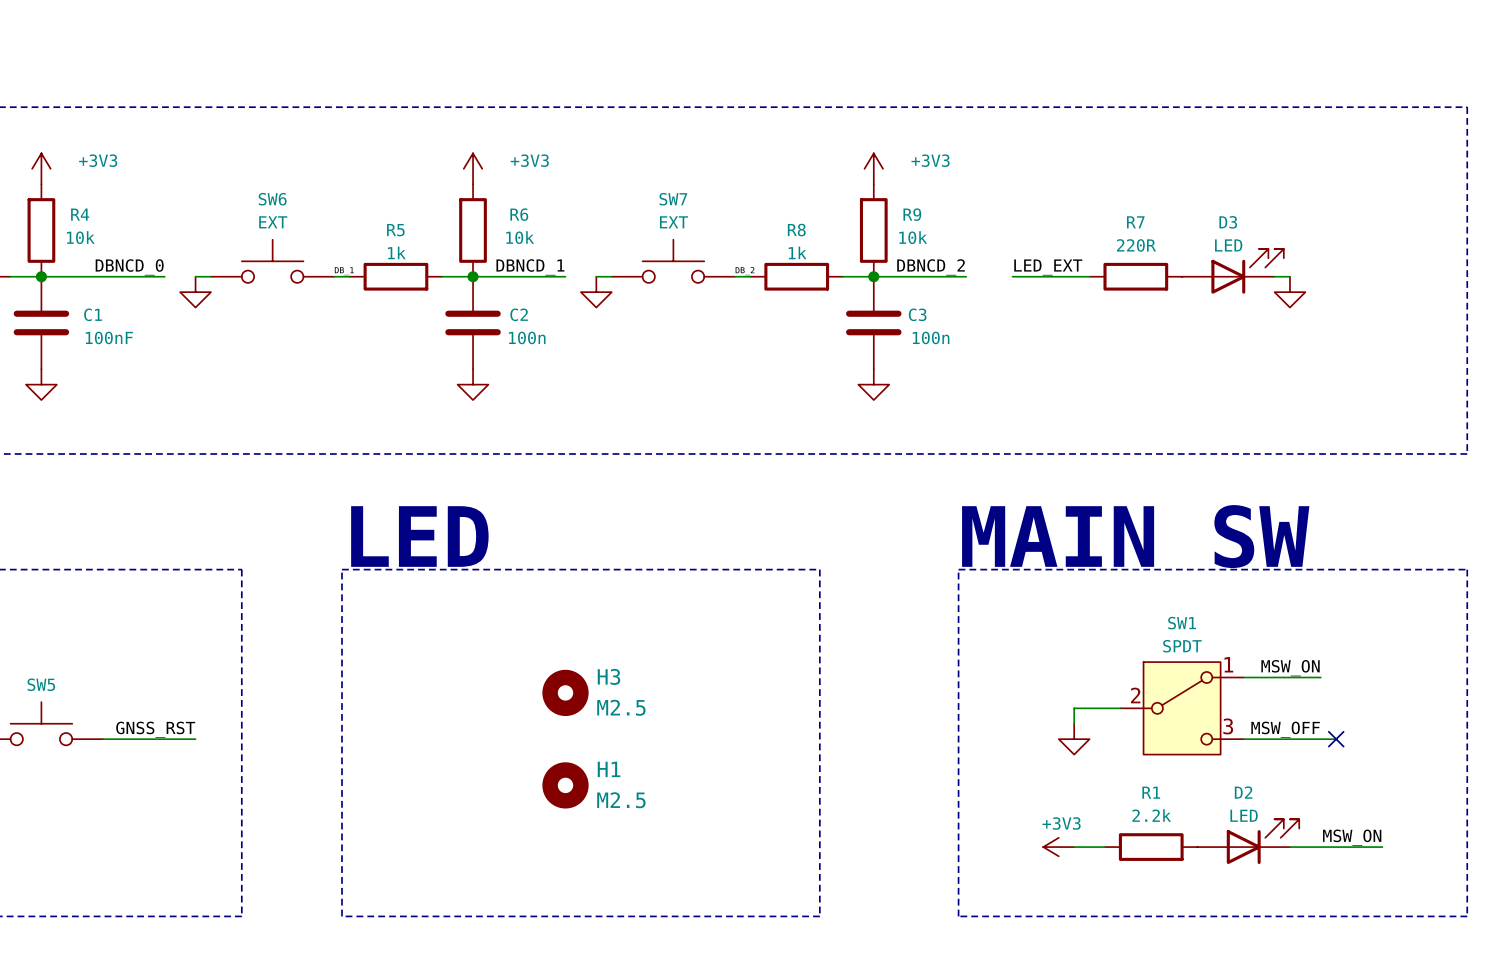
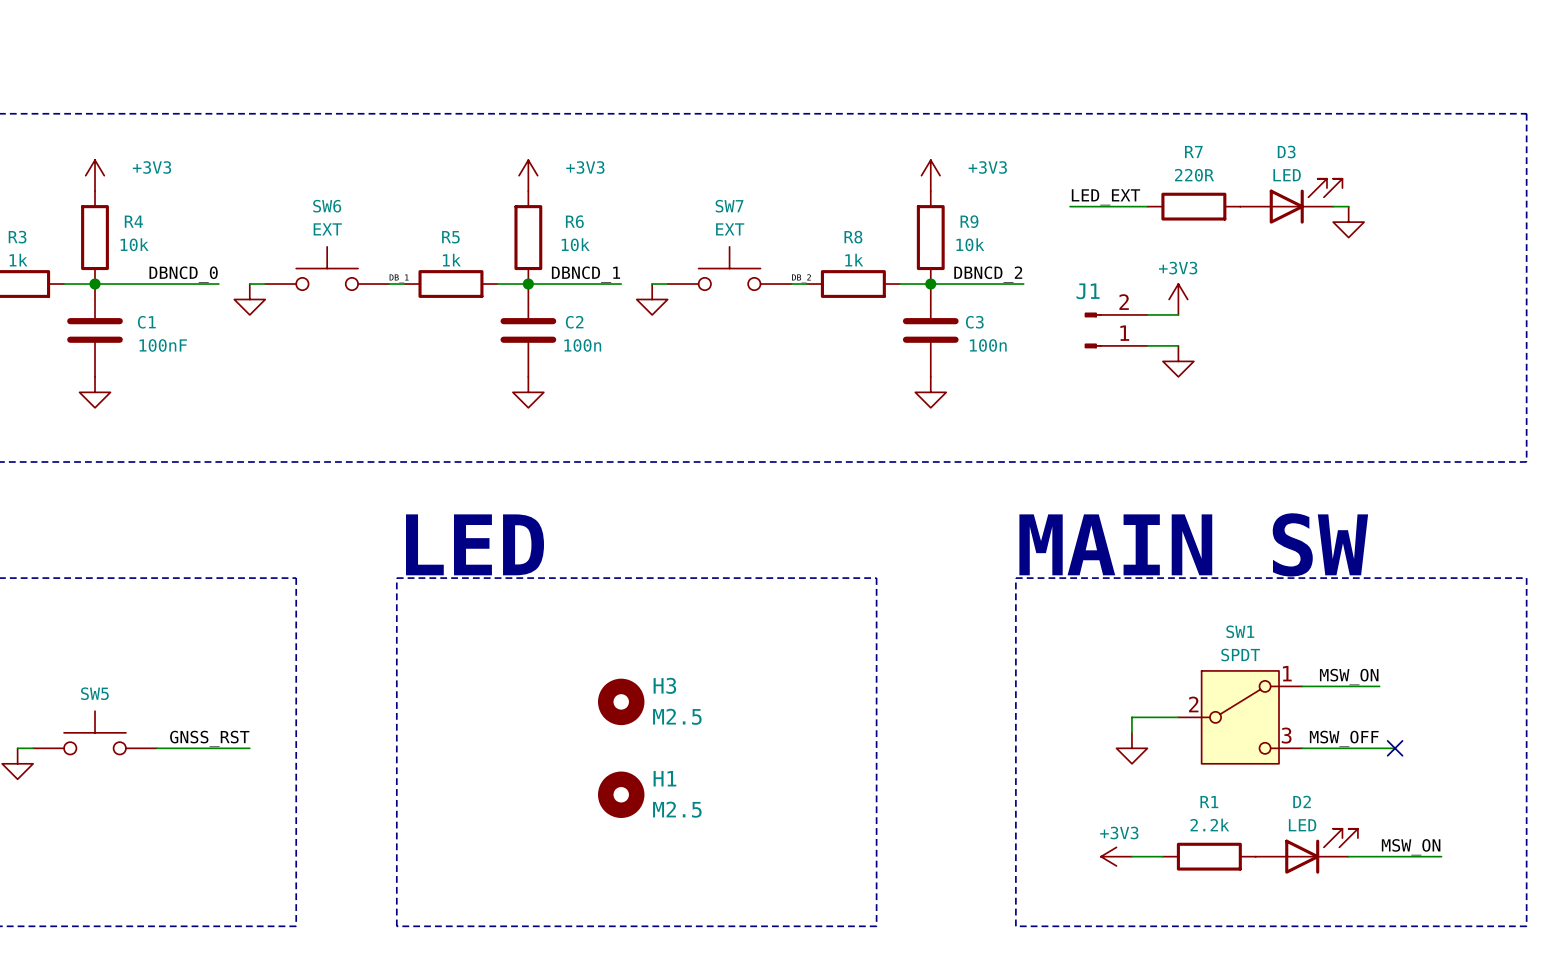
label position: LED_EXT (1048, 267) -> LED_EXT (1105, 197)
D3 position: (1232, 271) -> (1291, 201)
wire: (1012, 276) (1089, 276) -> (1070, 206) (1147, 206)
R7 position: (1135, 276) -> (1193, 206)
wire: (1274, 276) (1289, 276) -> (1333, 206) (1348, 206)
power symbol: none -> +3V3 (1178, 299)
power symbol position: (1289, 292) -> (1348, 222)
wire: none -> (1147, 314) (1178, 314)
J1: none -> (1116, 330)
wire: none -> (1147, 345) (1178, 345)
power symbol: none -> (1178, 361)

